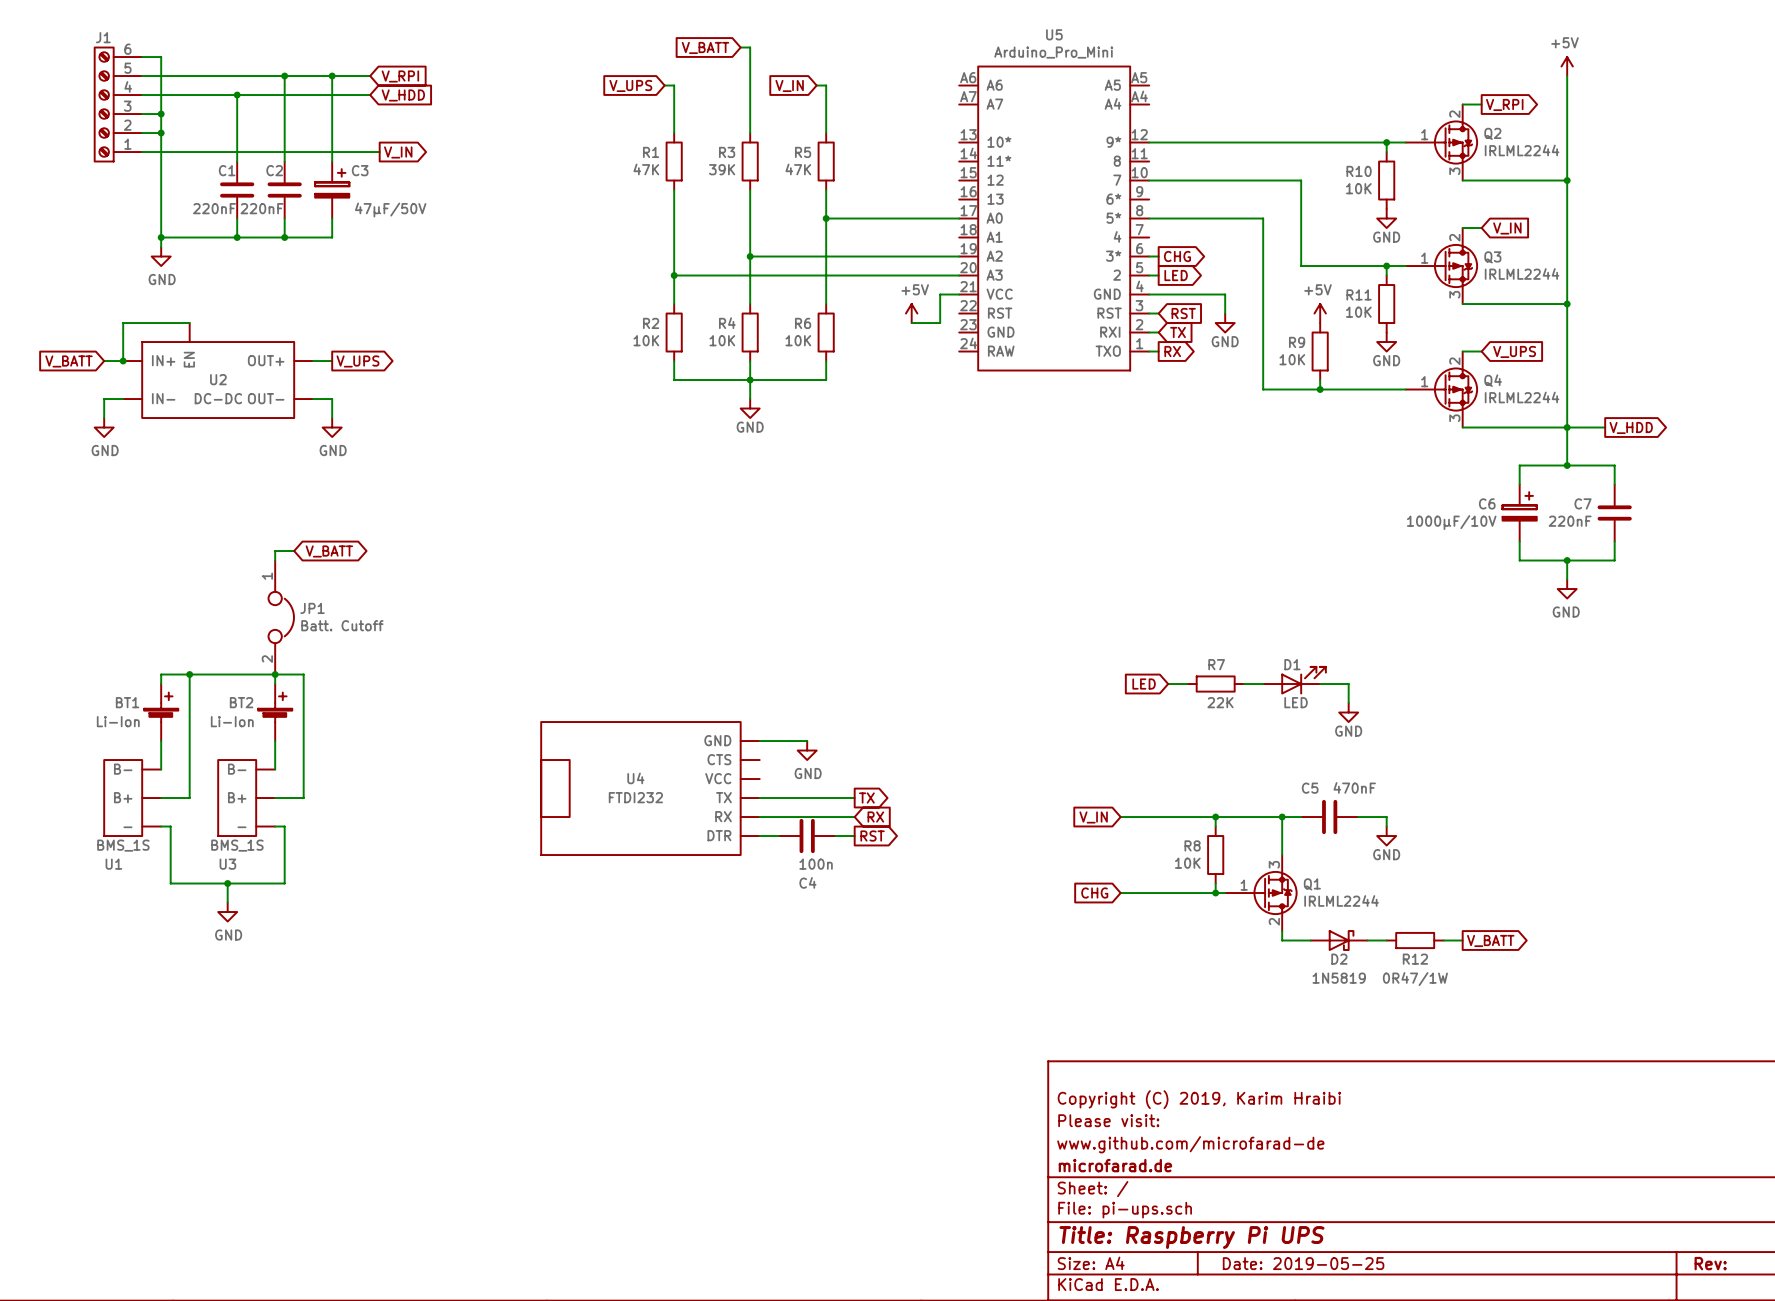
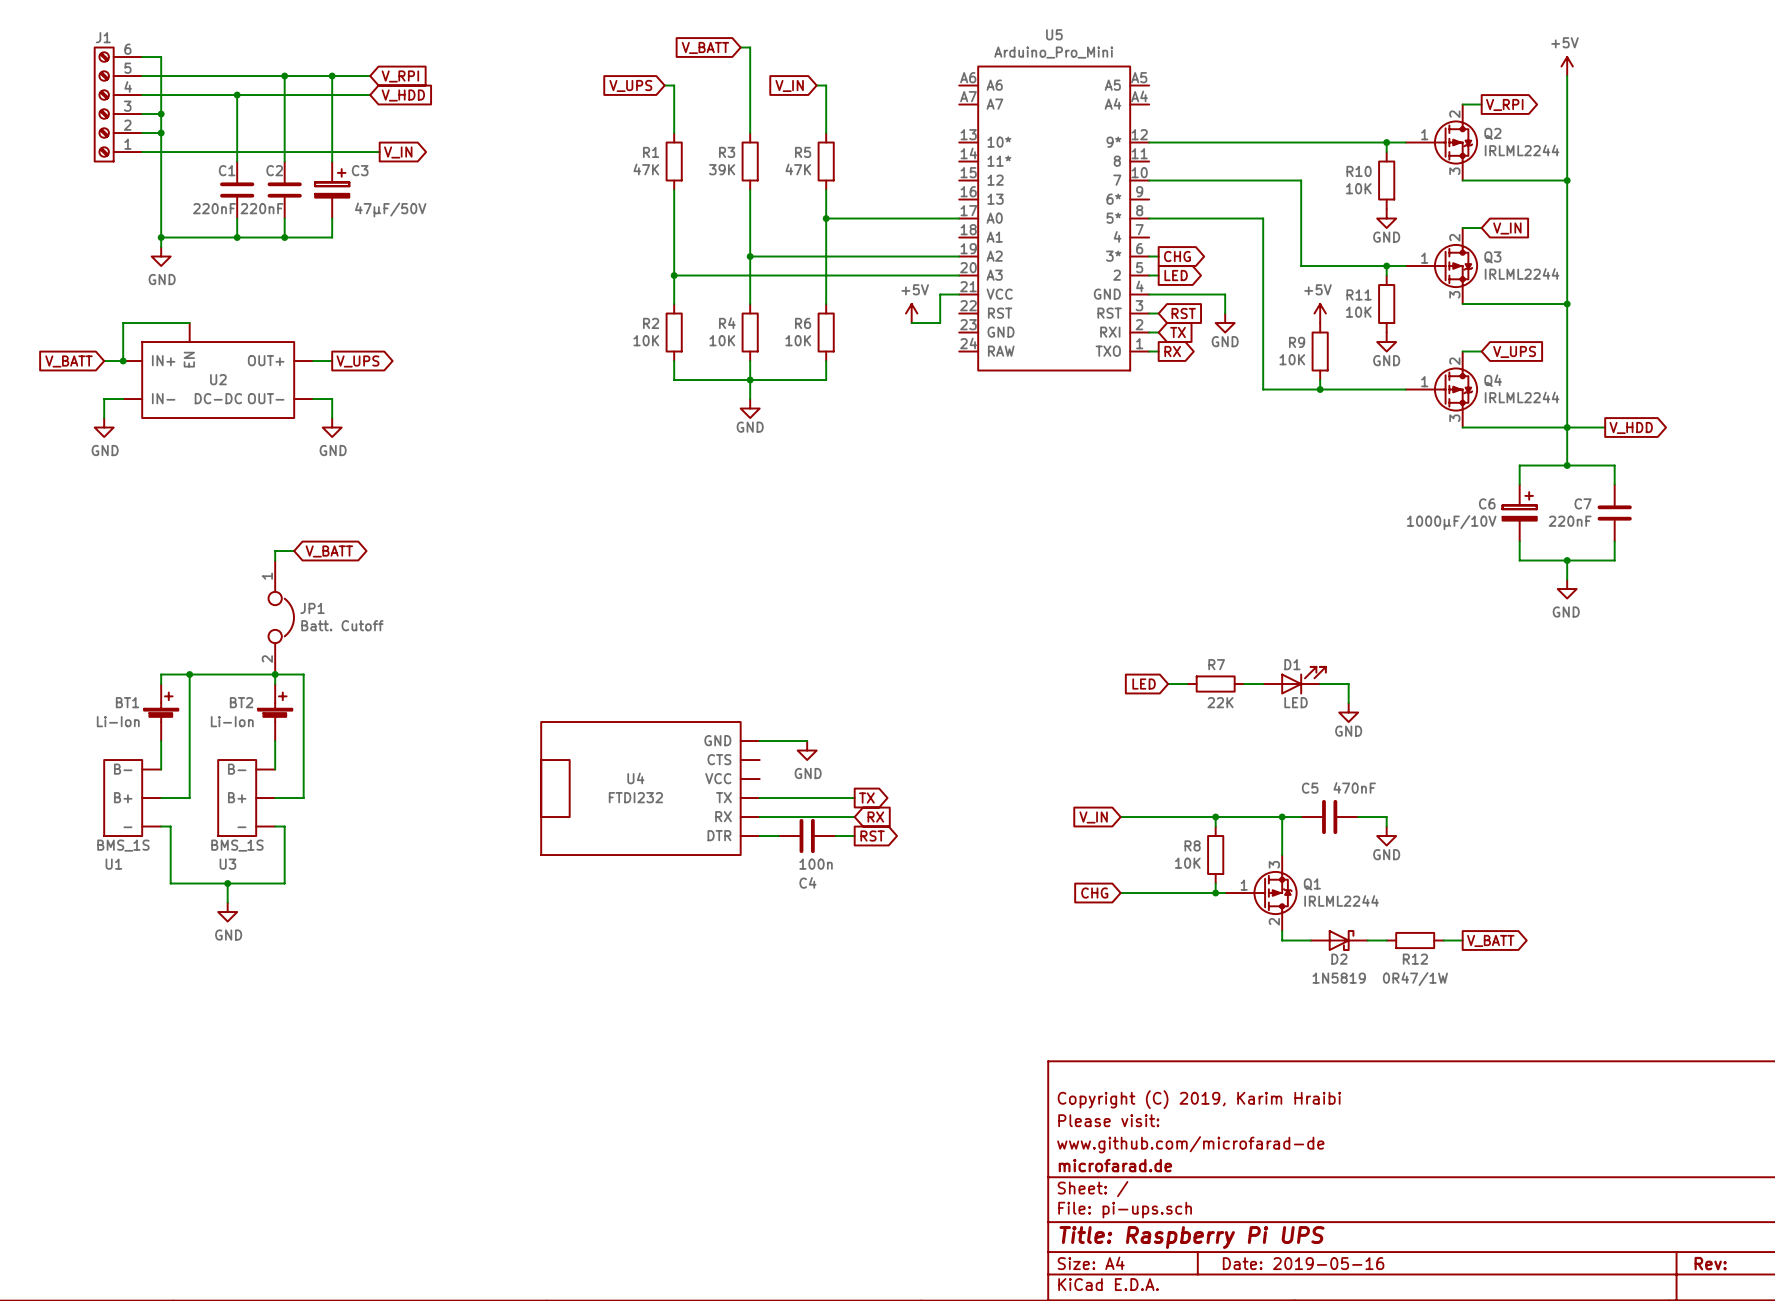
title block: Date: 2019-05-25 (1303, 1263) -> Date: 2019-05-16 (1303, 1263)

